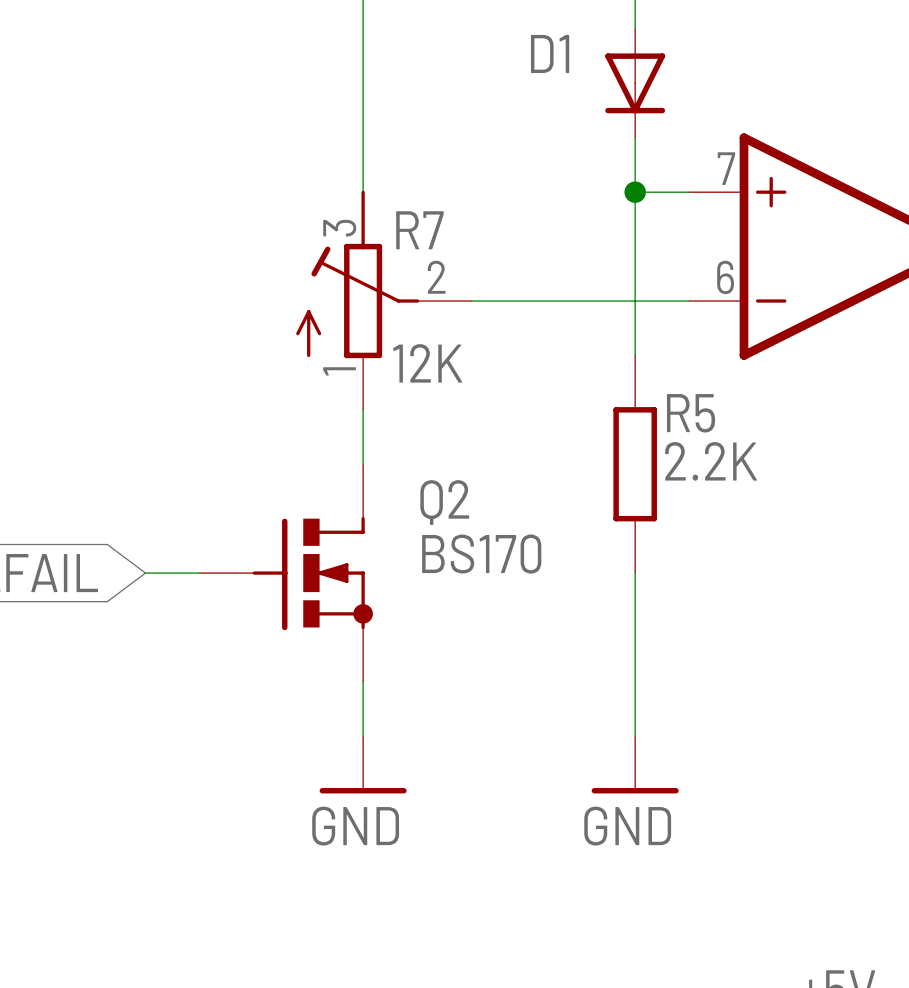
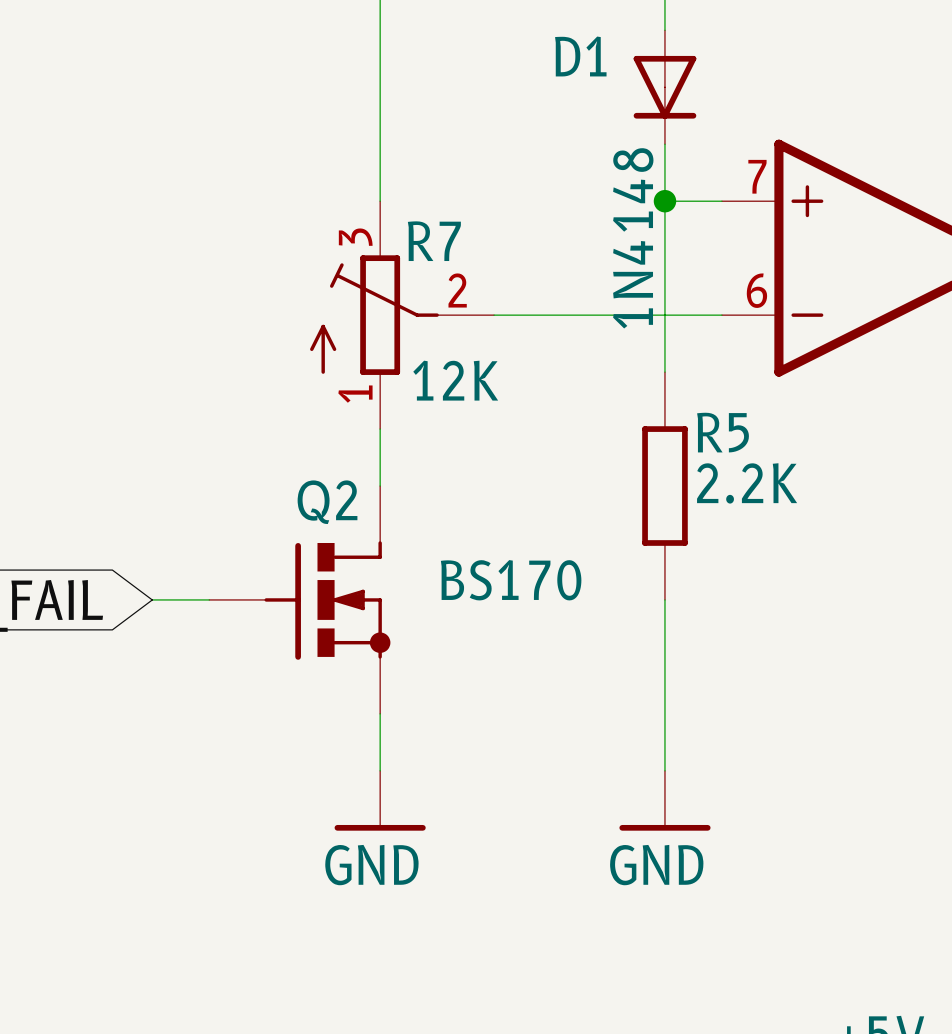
R7 symbol: [296, 190, 472, 410] -> [310, 201, 495, 430]
D1 value: none -> 1N4148 (633, 238)
Q2 name position: Q2 (444, 502) -> Q2 (327, 502)

